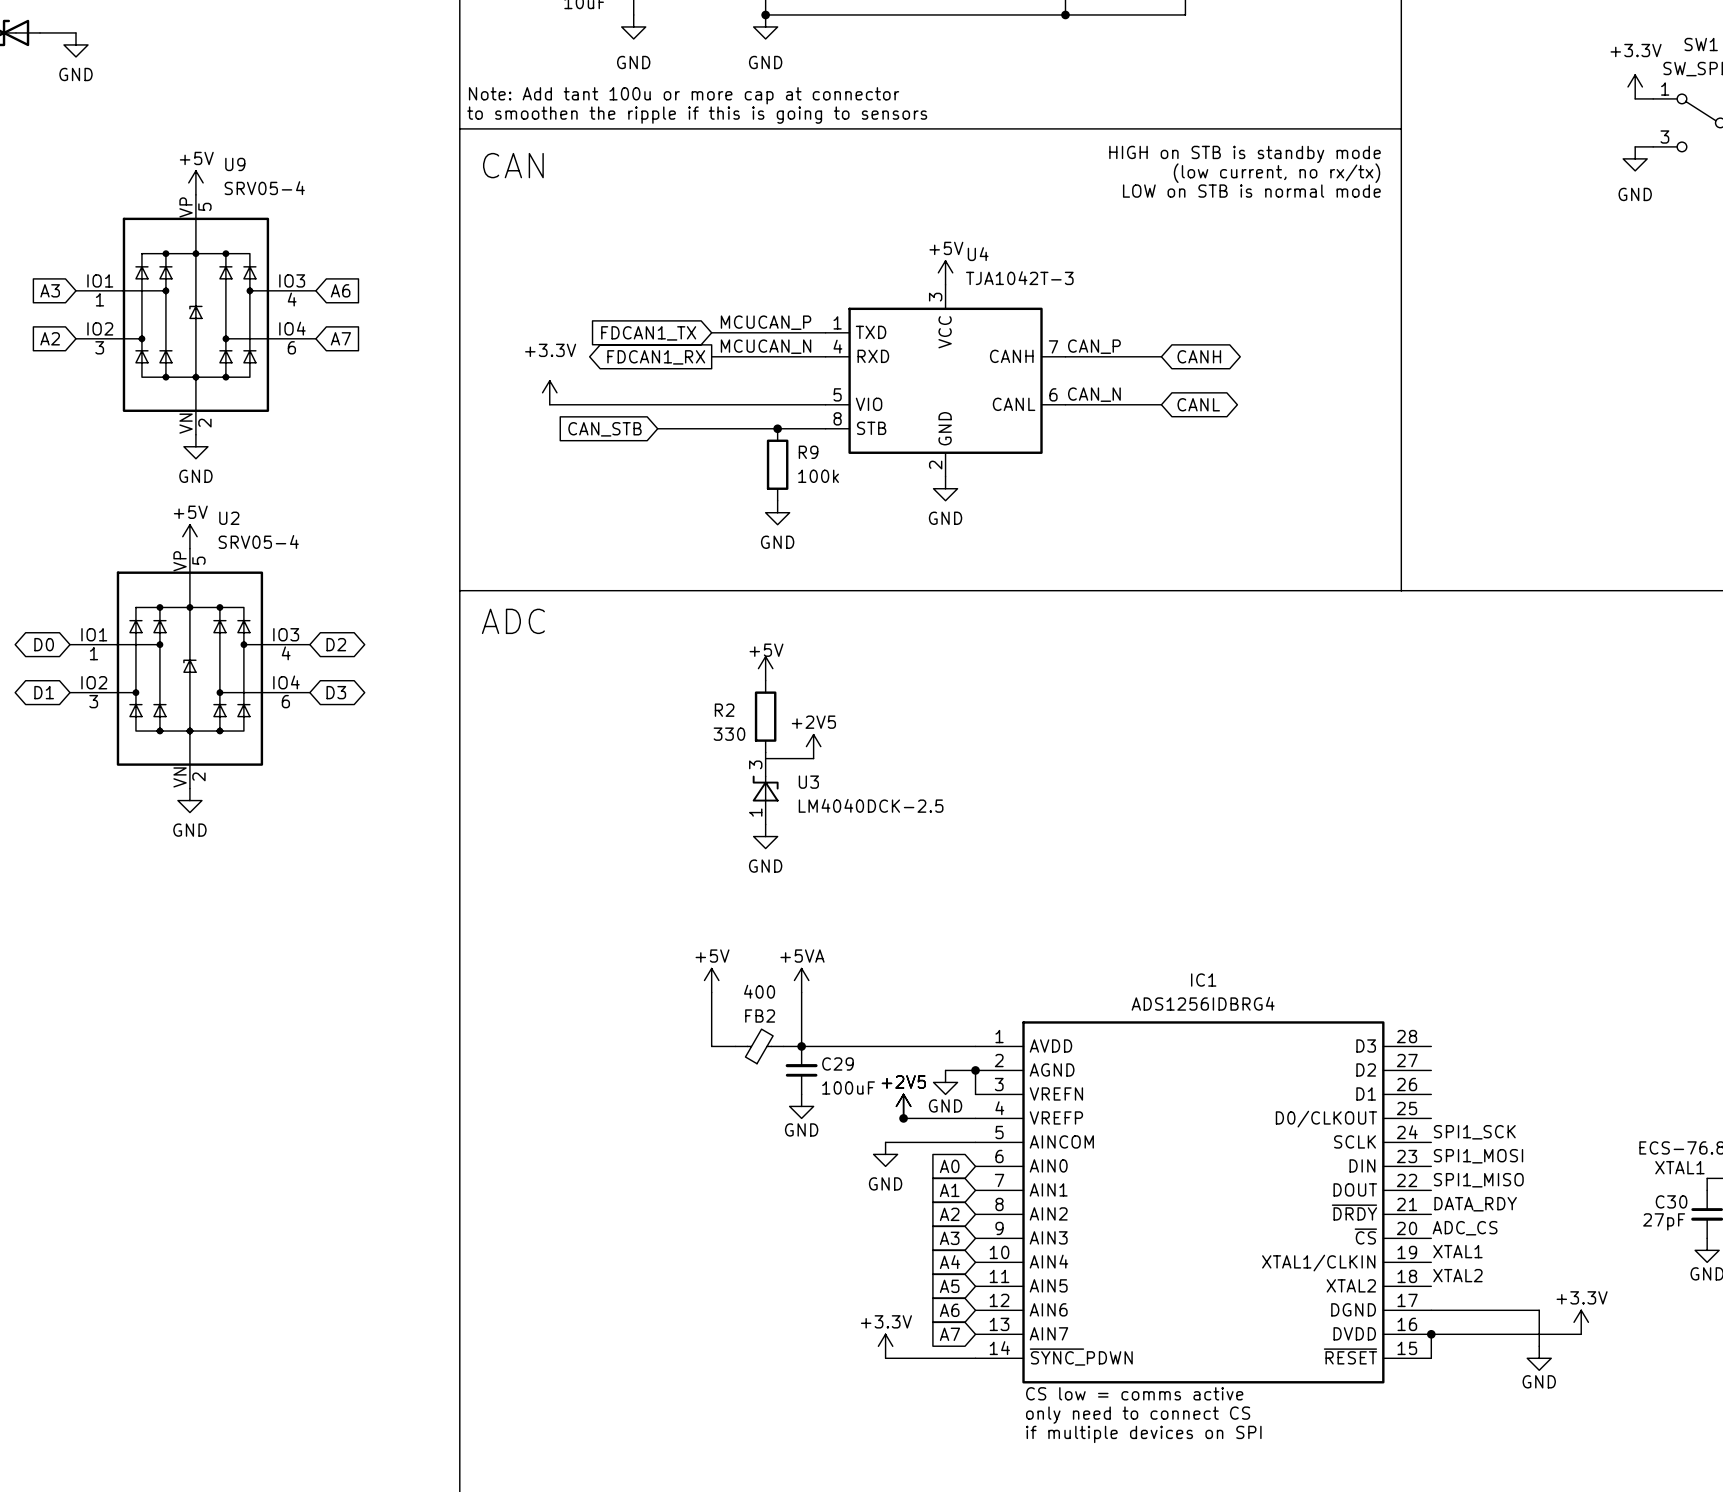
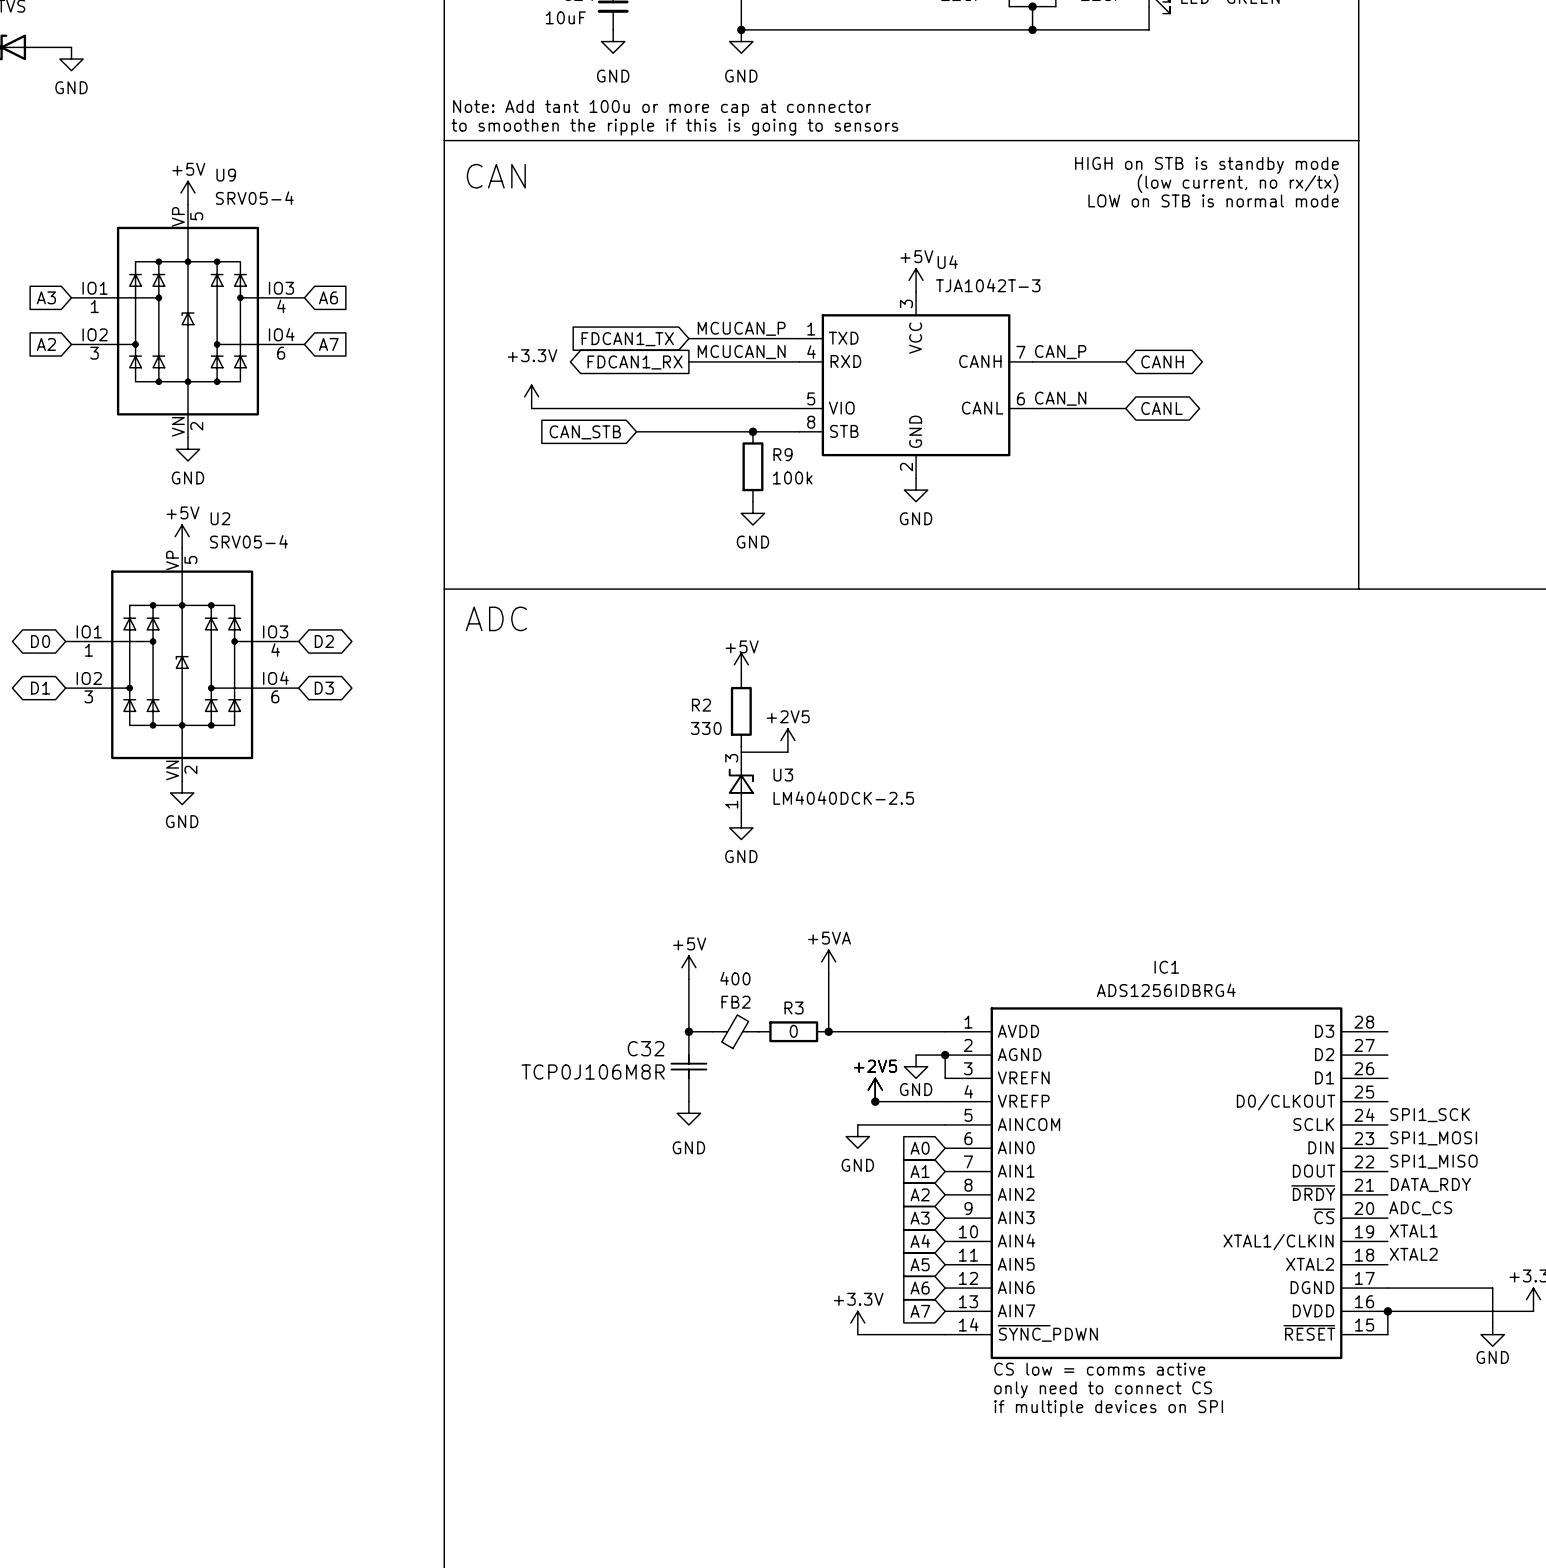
power symbol position: +5VA (801, 980) -> +5VA (828, 961)
wire: (801, 992) (801, 1046) -> none
junction: none -> (688, 1031)
wire: (783, 1046) (855, 1046) -> (828, 973) (828, 1031)
junction: (801, 1046) -> none
R3: none -> 0 (793, 1031)
junction: none -> (828, 1031)
C29: 100uF (801, 1070) -> none
C32: none -> TCP0J106M8R (688, 1066)
power symbol position: GND (801, 1106) -> GND (688, 1113)
power symbol text position: GND (801, 1129) -> GND (688, 1147)

